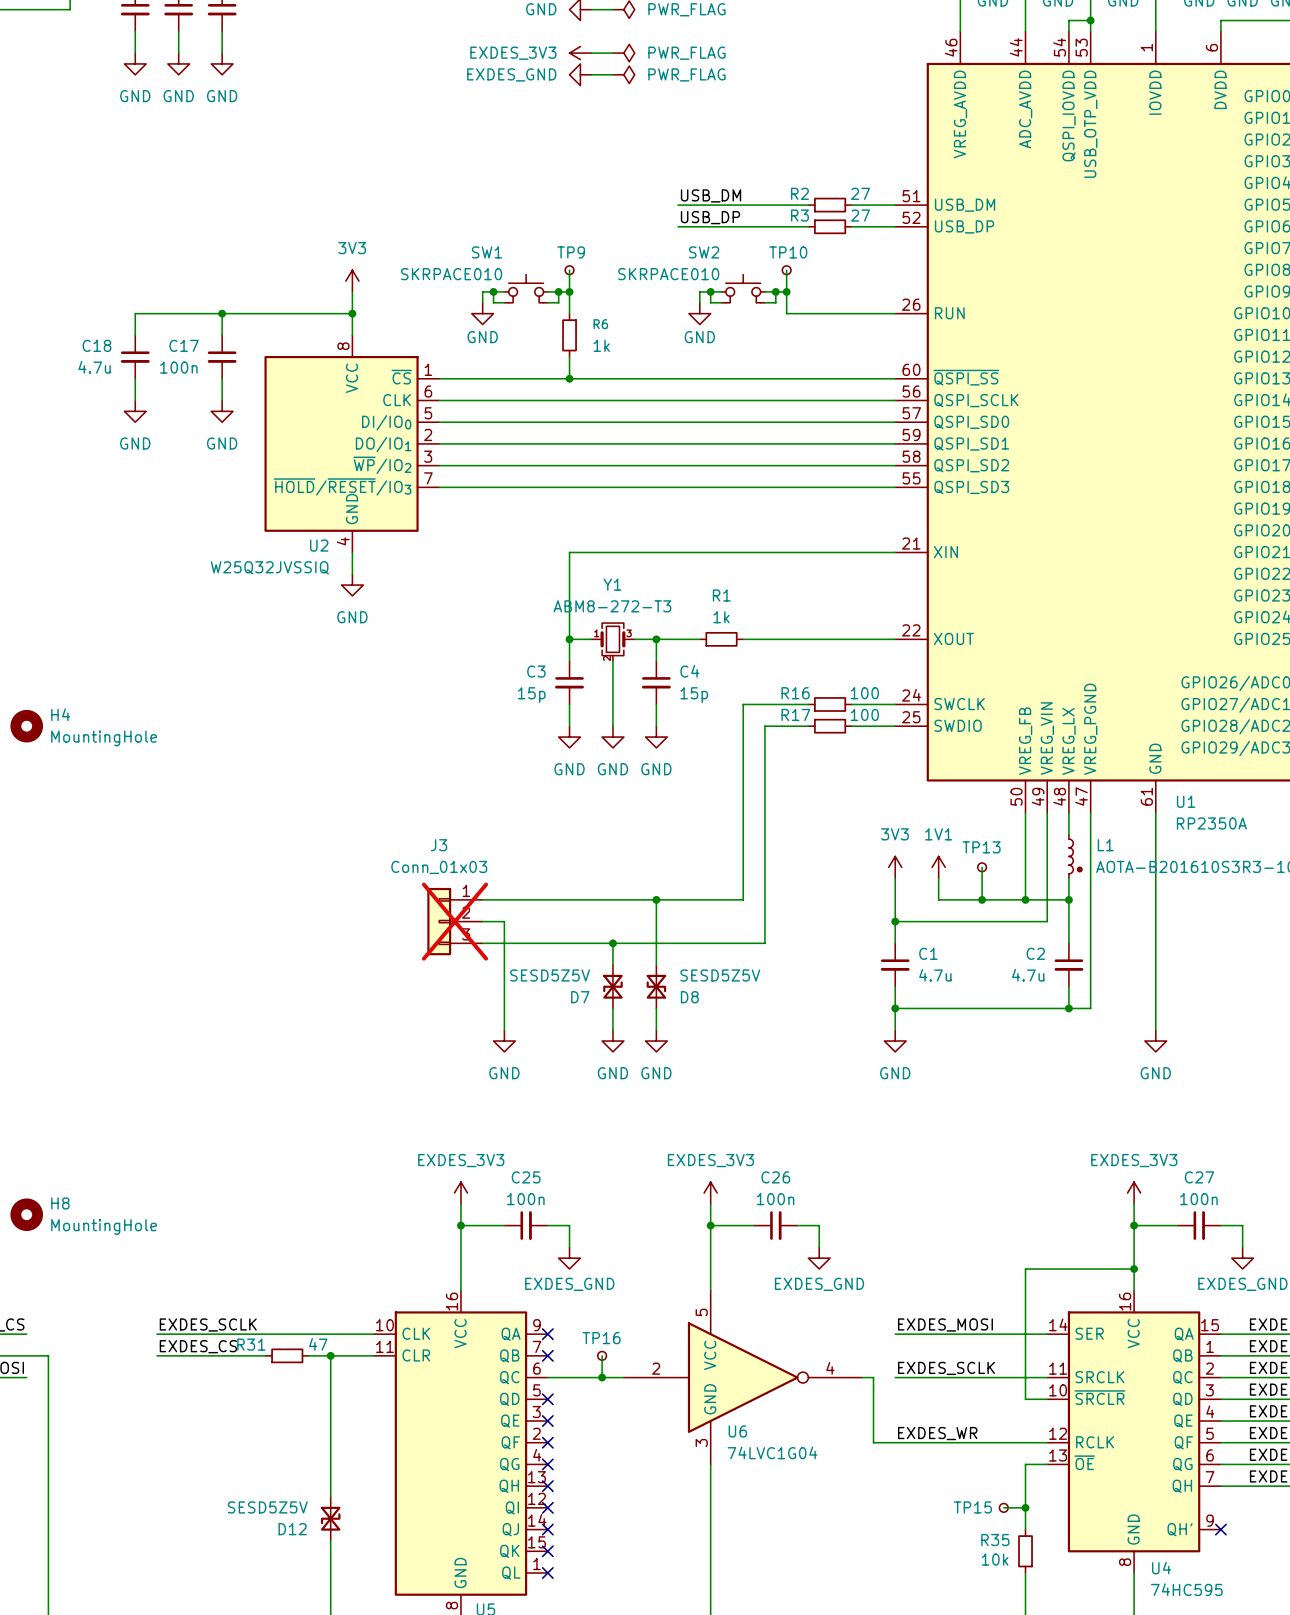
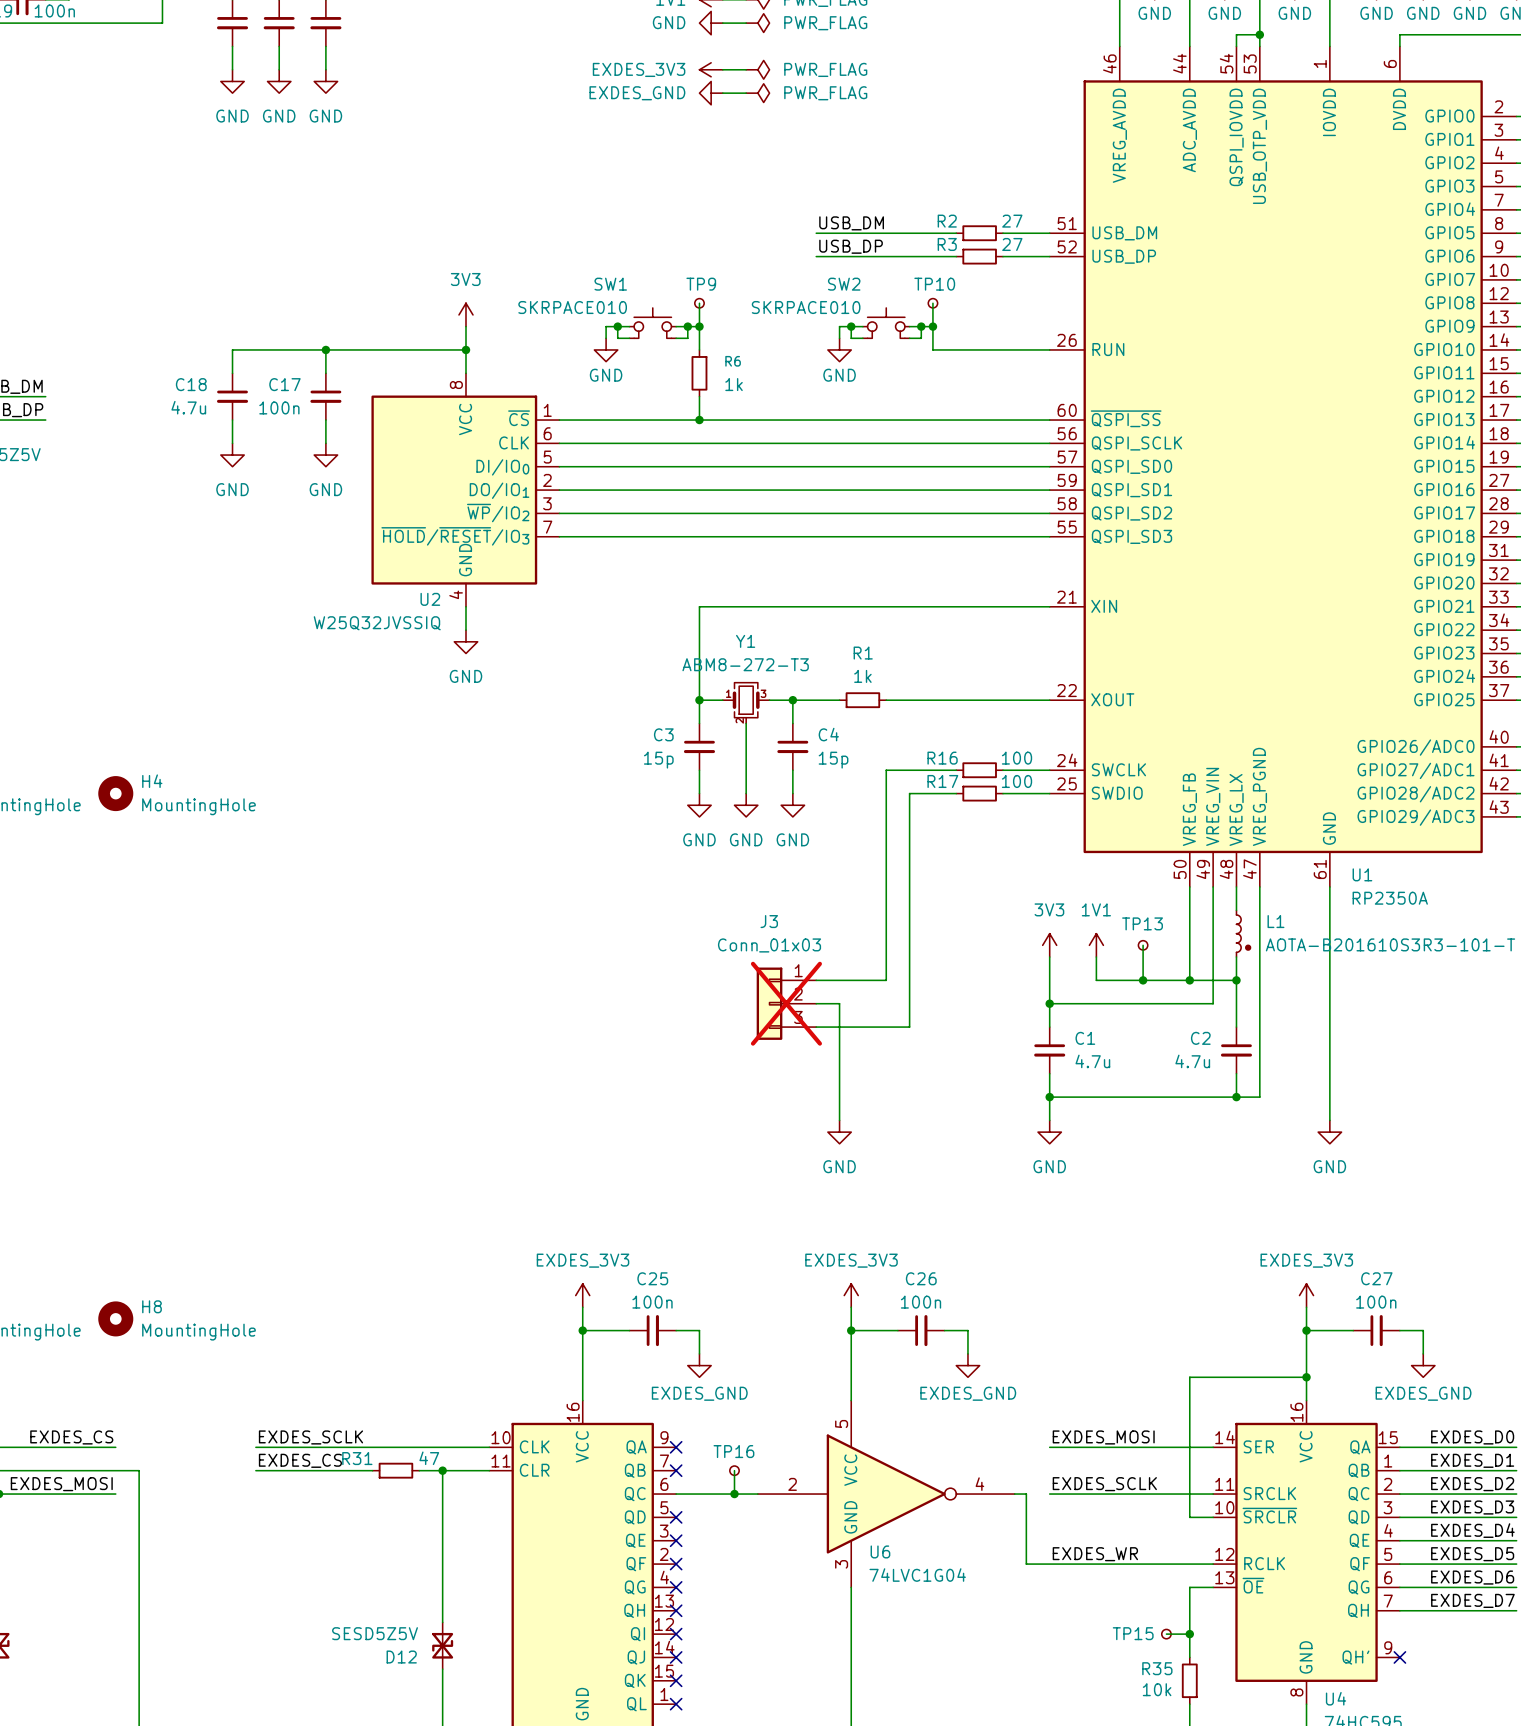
wire: (482, 899) (678, 899) -> none
wire: (656, 899) (656, 965) -> none
junction: (656, 899) -> none
J3 position: (455, 921) -> (786, 1003)
wire: (482, 921) (504, 921) (504, 1030) -> (816, 1003) (839, 1003) (839, 1120)
wire: (482, 943) (678, 943) -> none
wire: (612, 943) (612, 965) -> none
junction: (612, 943) -> none
D7: SESD5Z5V (612, 986) -> none
D8: SESD5Z5V (656, 986) -> none
wire: (612, 1008) (612, 1030) -> none
wire: (656, 1008) (656, 1030) -> none
power symbol: GND (504, 1041) -> none
power symbol: GND (612, 1041) -> none
power symbol: GND (656, 1041) -> none
power symbol: none -> GND (839, 1132)

